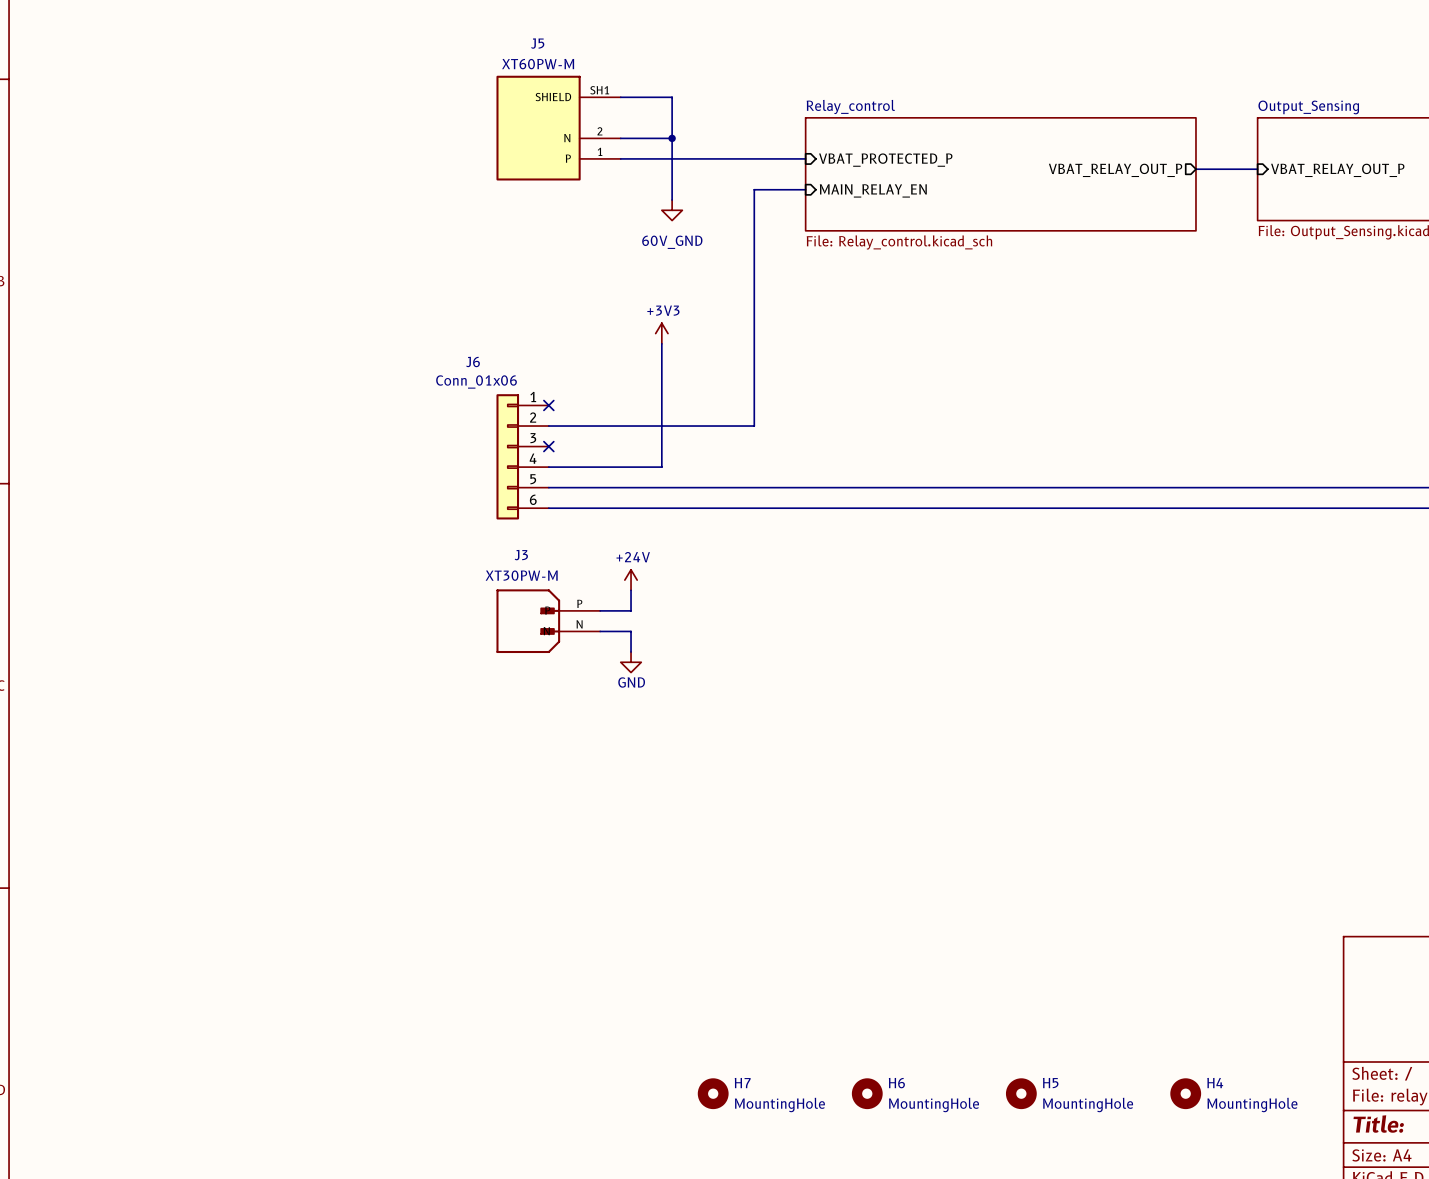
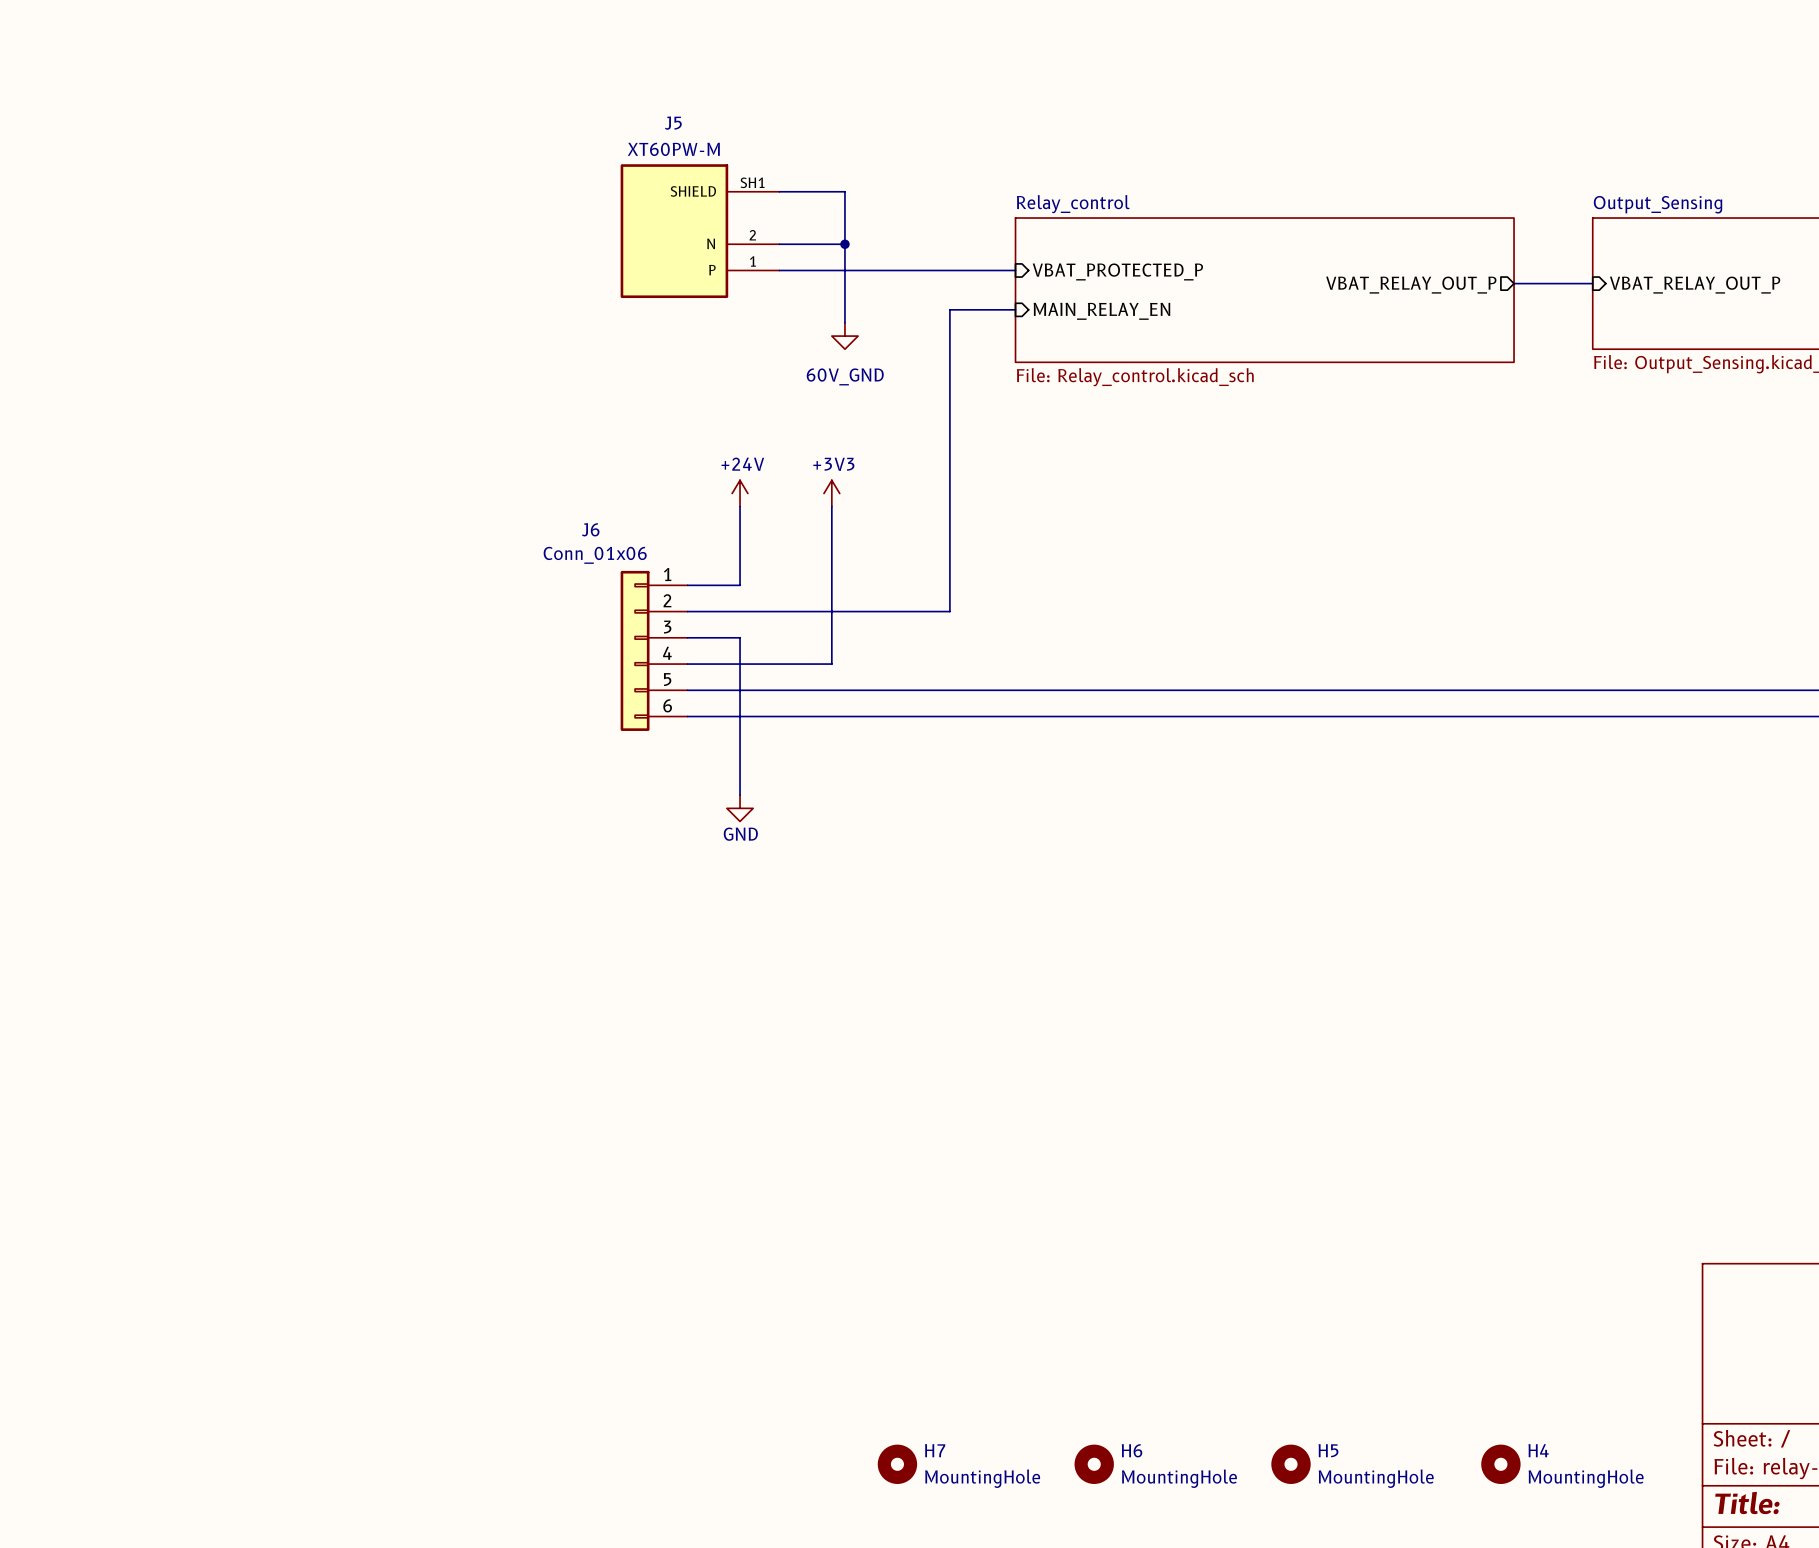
power symbol: none -> +24V (740, 493)
wire: none -> (740, 506) (740, 585) (687, 585)
no-connect mark: (548, 405) -> none
wire: none -> (687, 637) (740, 637) (740, 795)
no-connect mark: (548, 446) -> none
power symbol: +24V (631, 580) -> none
wire: (631, 590) (631, 610) (600, 610) -> none
J3: XT30PW-M (548, 621) -> none
wire: (600, 631) (631, 631) (631, 652) -> none
power symbol position: GND (631, 662) -> GND (740, 808)

